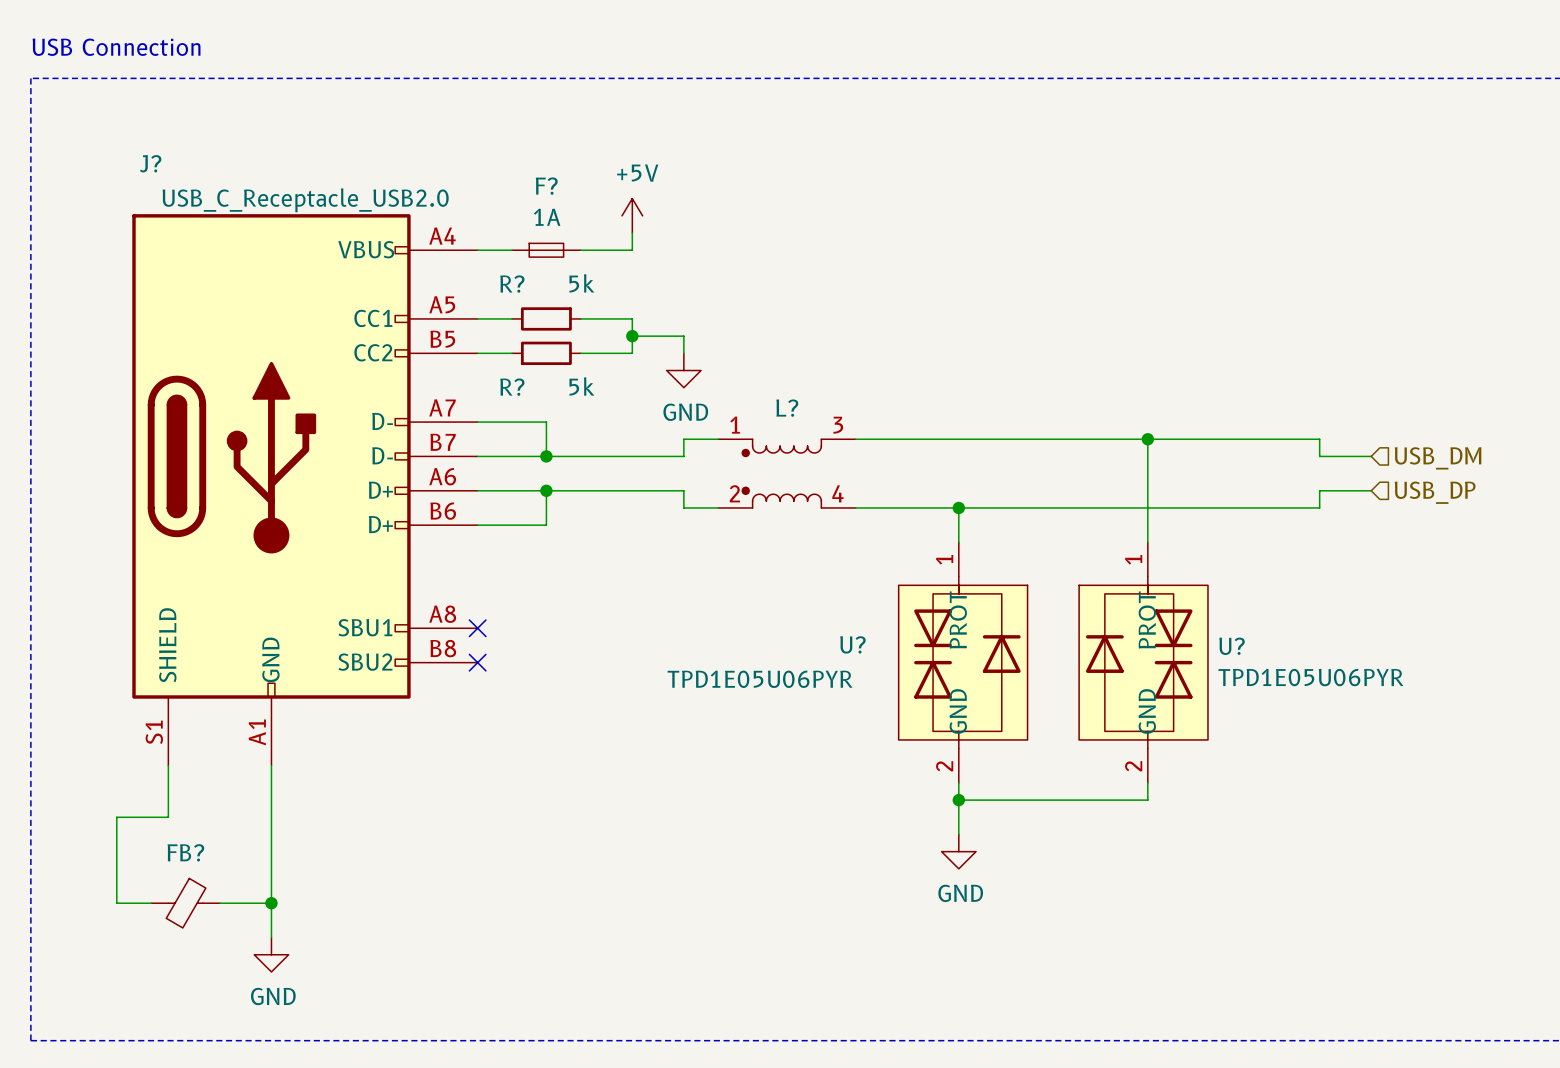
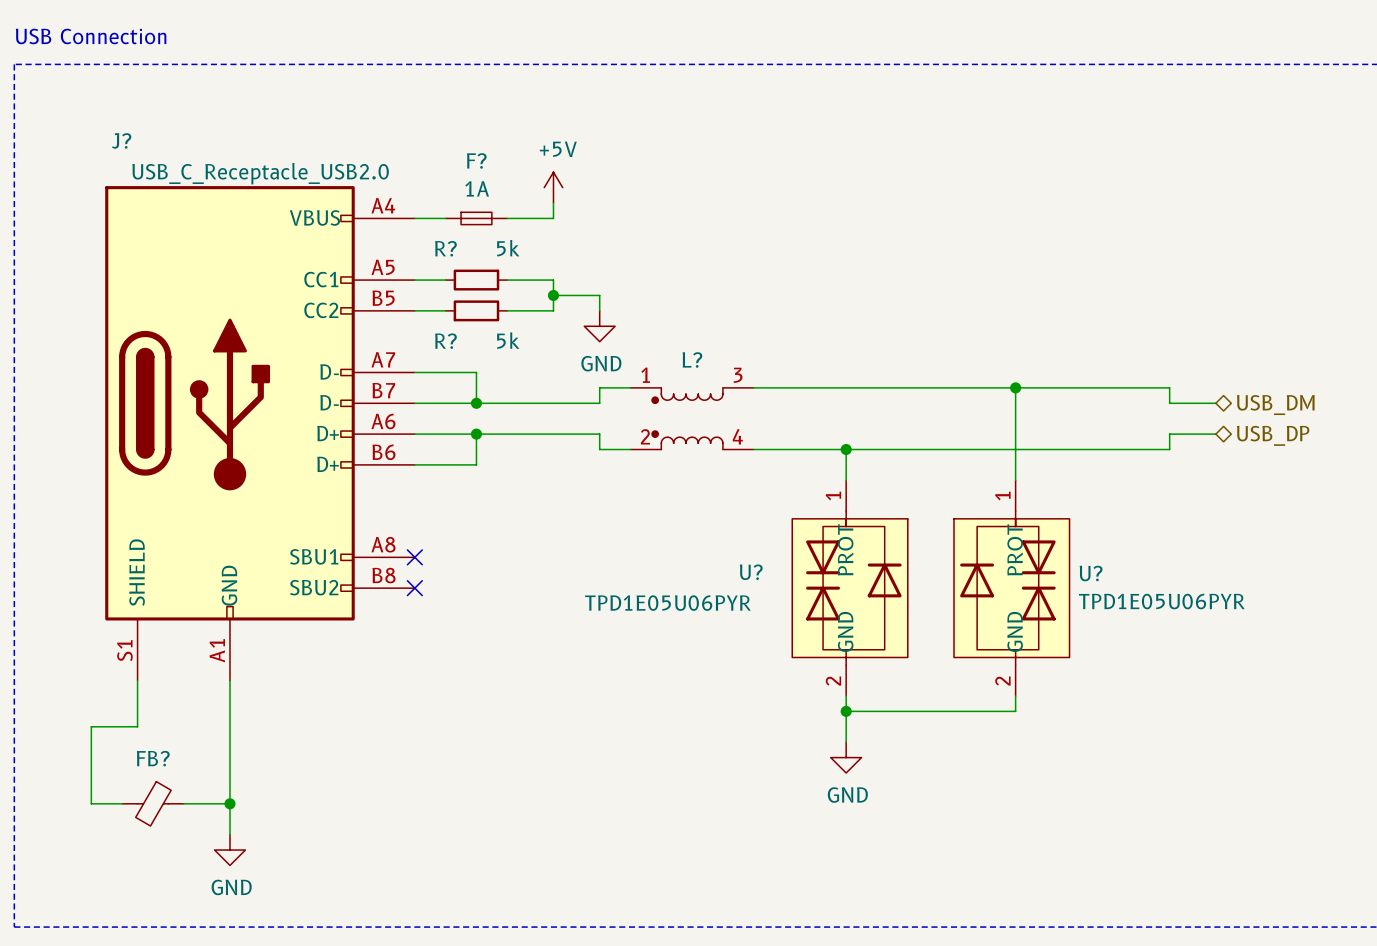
hierarchical label shape: input (1438, 458) -> bidirectional (1275, 405)
hierarchical label shape: input (1435, 492) -> bidirectional (1273, 435)

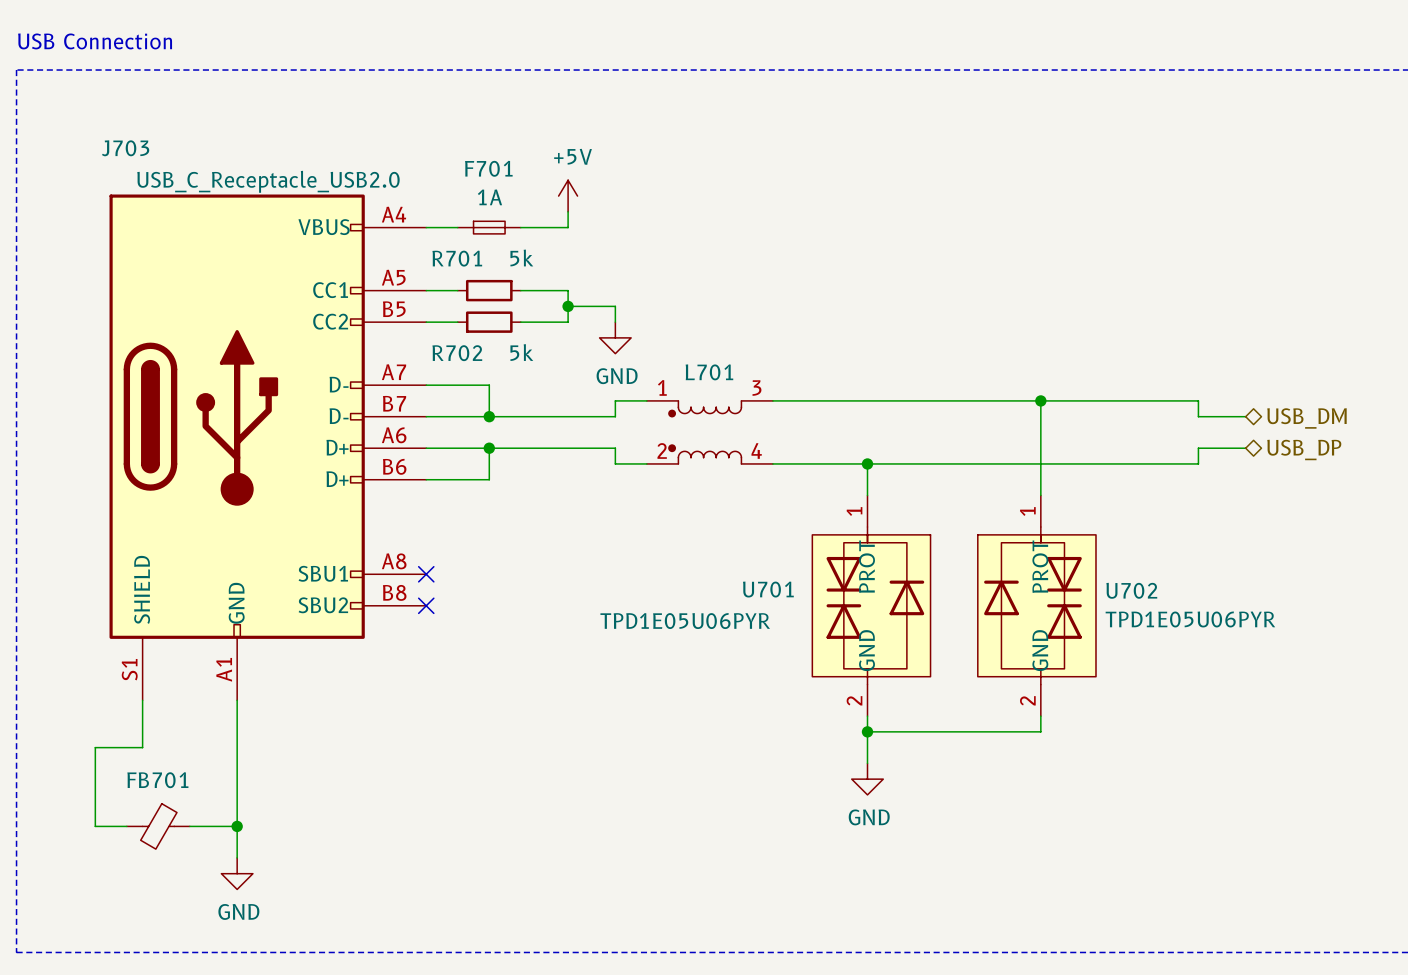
J? name: J? (121, 140) -> J703 (125, 148)
F? name: F? (476, 160) -> F701 (488, 168)
R? name: R? (445, 248) -> R701 (457, 258)
R? name: R? (445, 341) -> R702 (457, 353)
L? name: L? (692, 359) -> L701 (709, 372)
U? name: U? (751, 572) -> U701 (768, 589)
U? name: U? (1091, 573) -> U702 (1131, 590)
FB? name: FB? (153, 758) -> FB701 (157, 780)

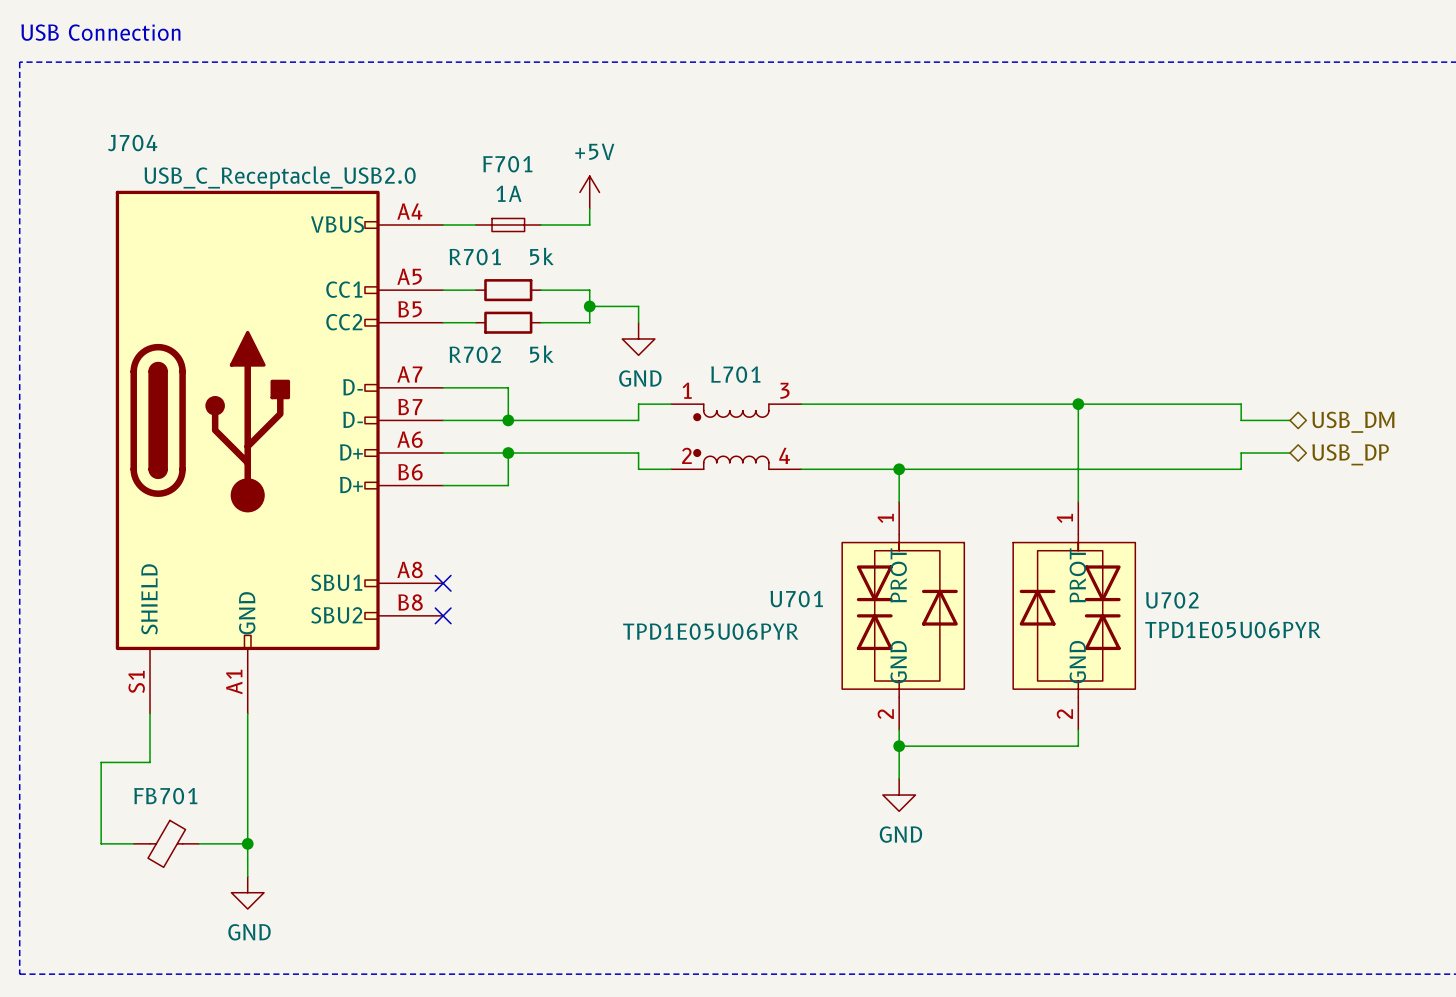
J703 name: J703 (125, 148) -> J704 (132, 143)

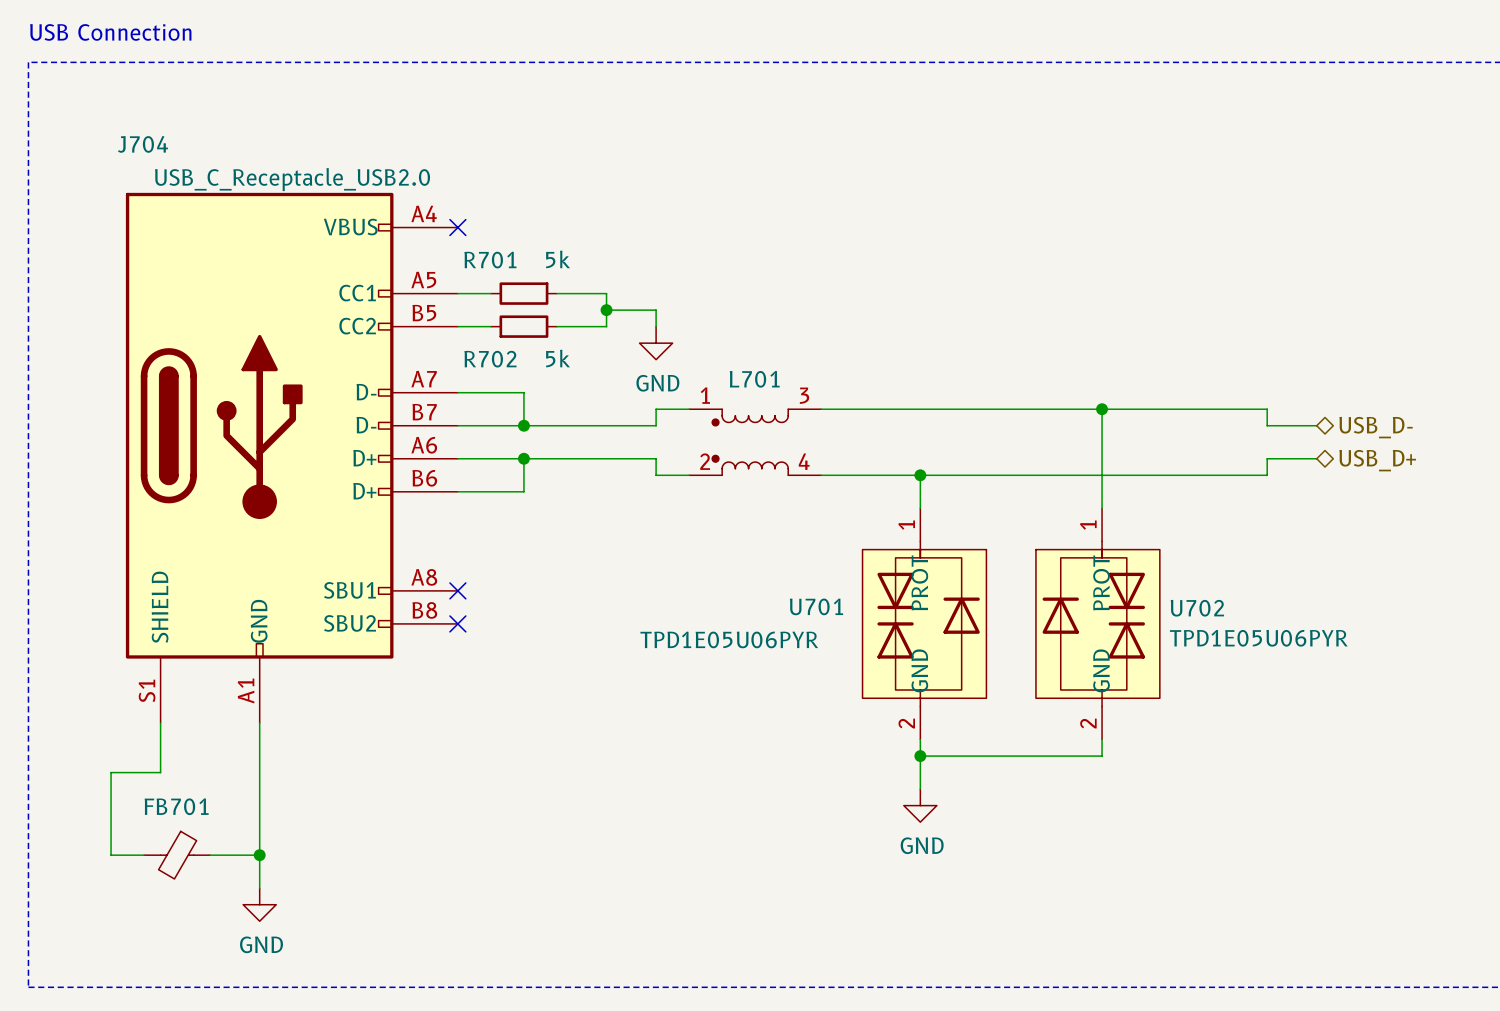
power symbol: +5V (589, 192) -> none
wire: (589, 208) (589, 224) (540, 224) -> none
wire: (443, 224) (475, 224) -> none
no-connect mark: none -> (457, 227)
F701: 1A (508, 224) -> none
hierarchical label: USB_DM (1353, 422) -> USB_D- (1376, 427)
hierarchical label: USB_DP (1350, 454) -> USB_D+ (1377, 460)

